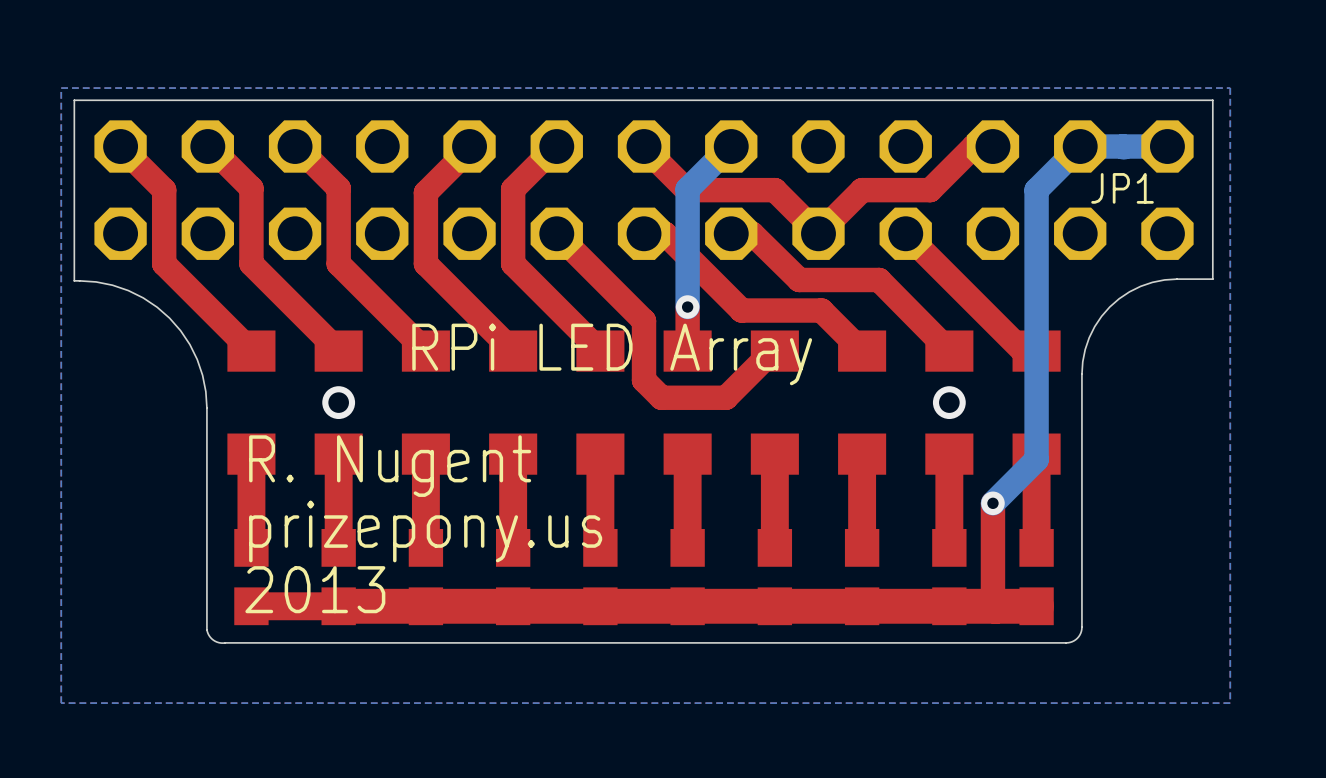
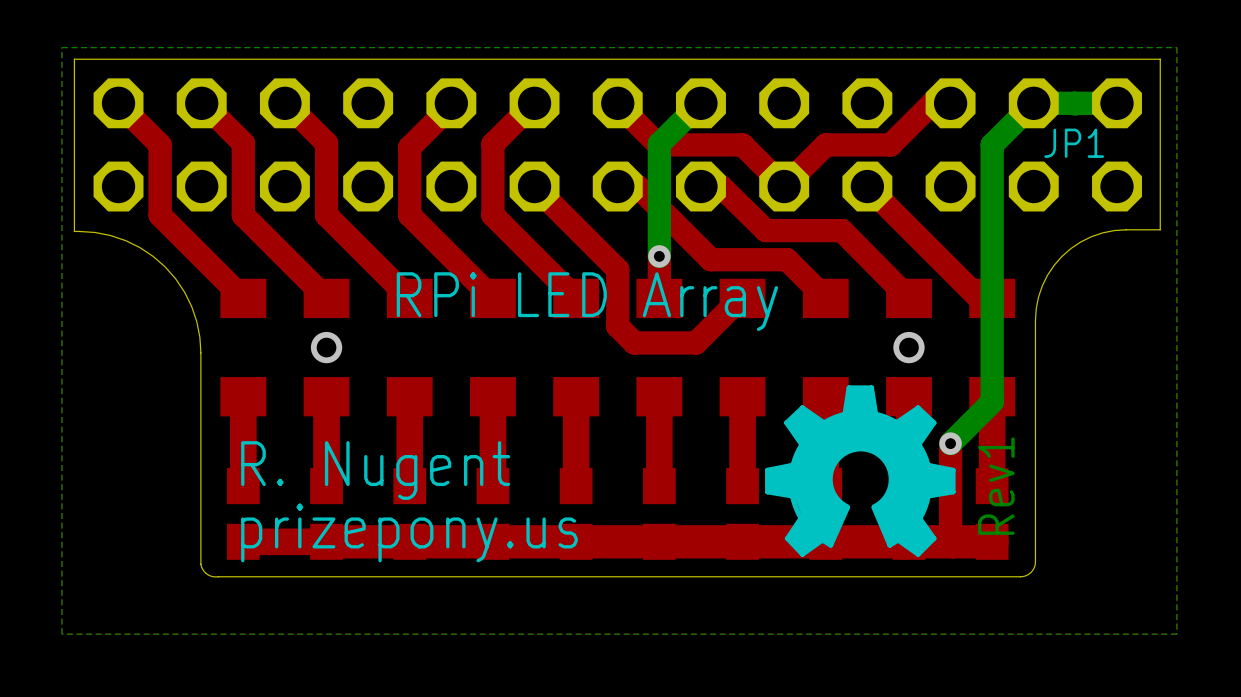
drawing: none -> [765, 385, 956, 557]
text: R. Nugent (390, 466) -> none
text: prizepony.us (425, 531) -> R. Nugent (375, 470)
text: none -> Rev1 (996, 486)
text: 2013 (315, 589) -> prizepony.us (409, 532)

